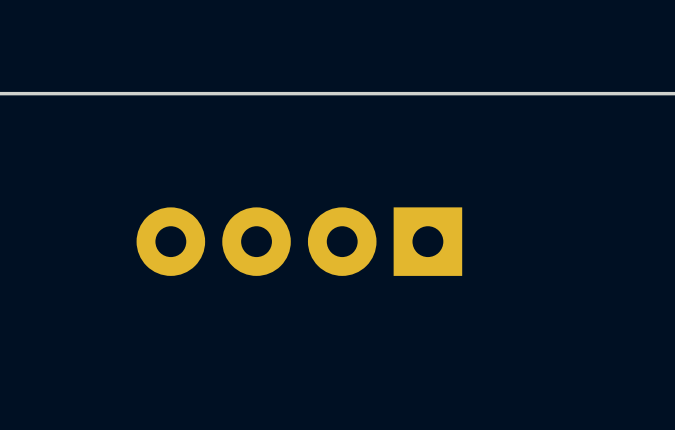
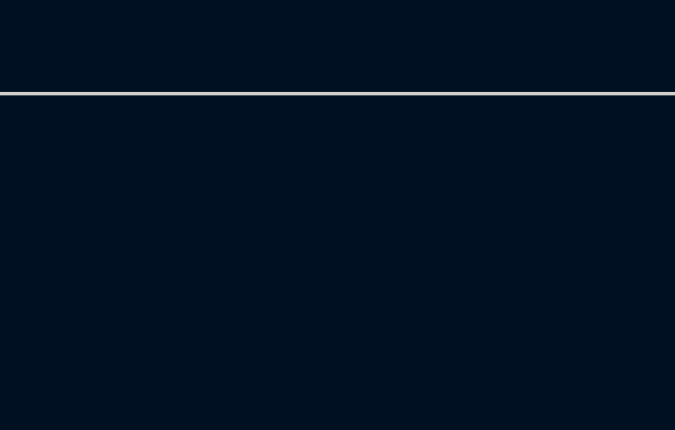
part: (299, 241) -> none

